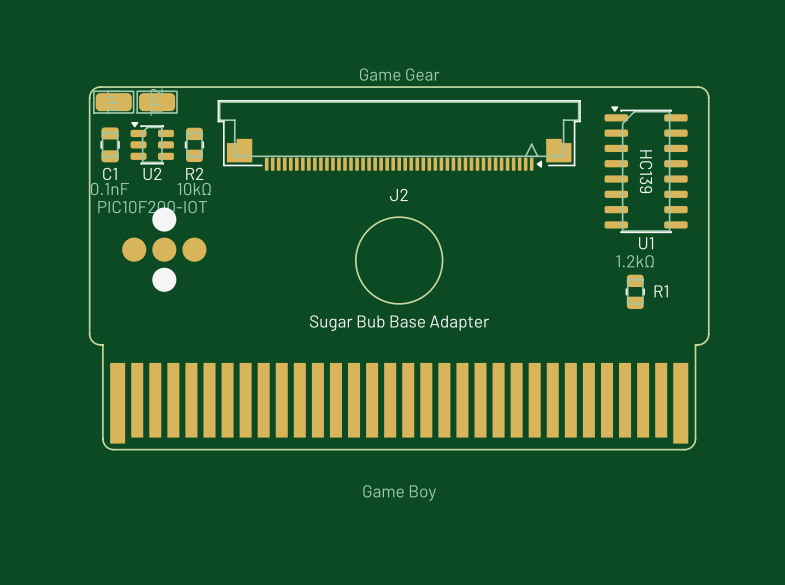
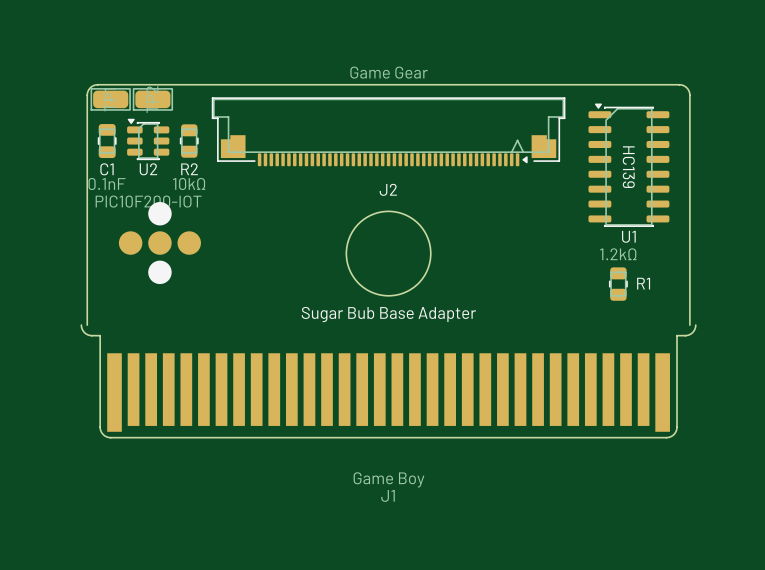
part: Game Boy (399, 333) -> none
J1: none -> Game Boy (388, 324)

